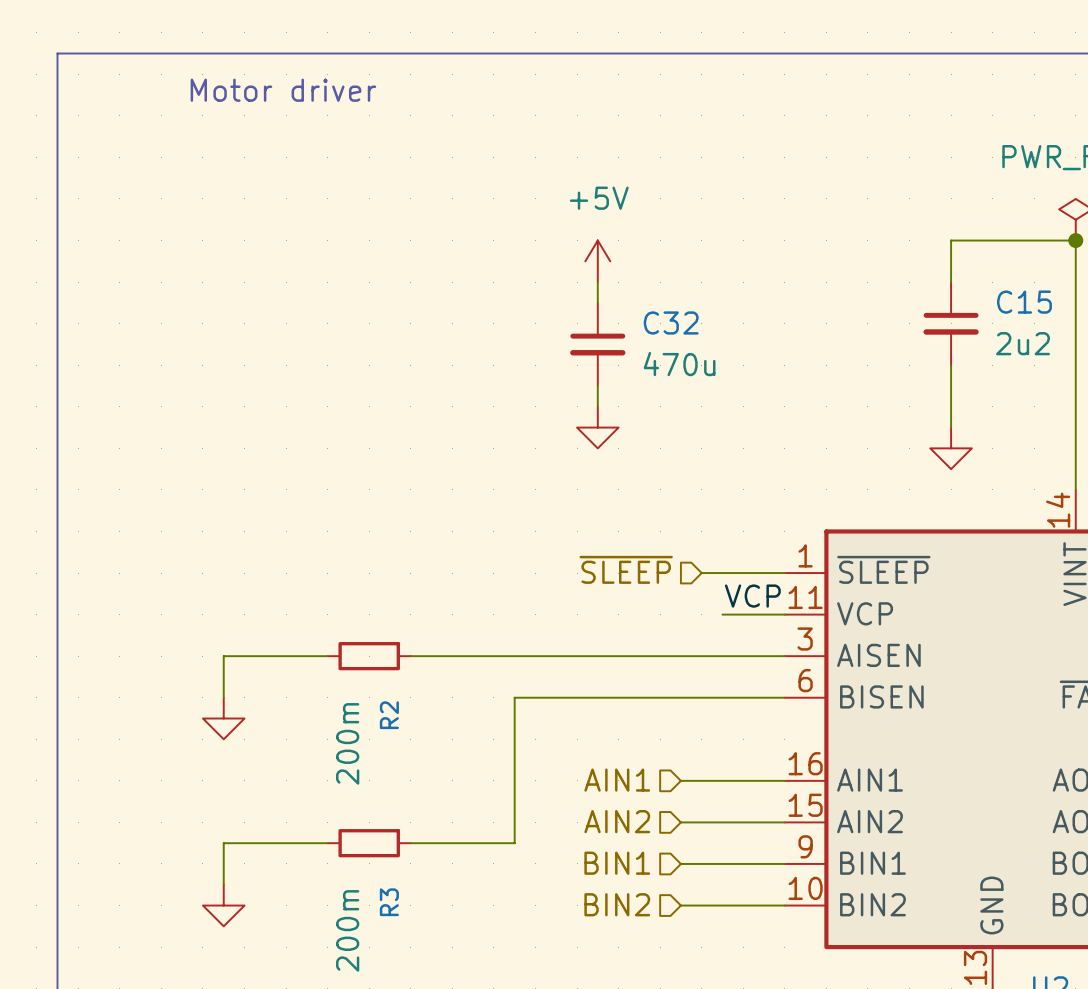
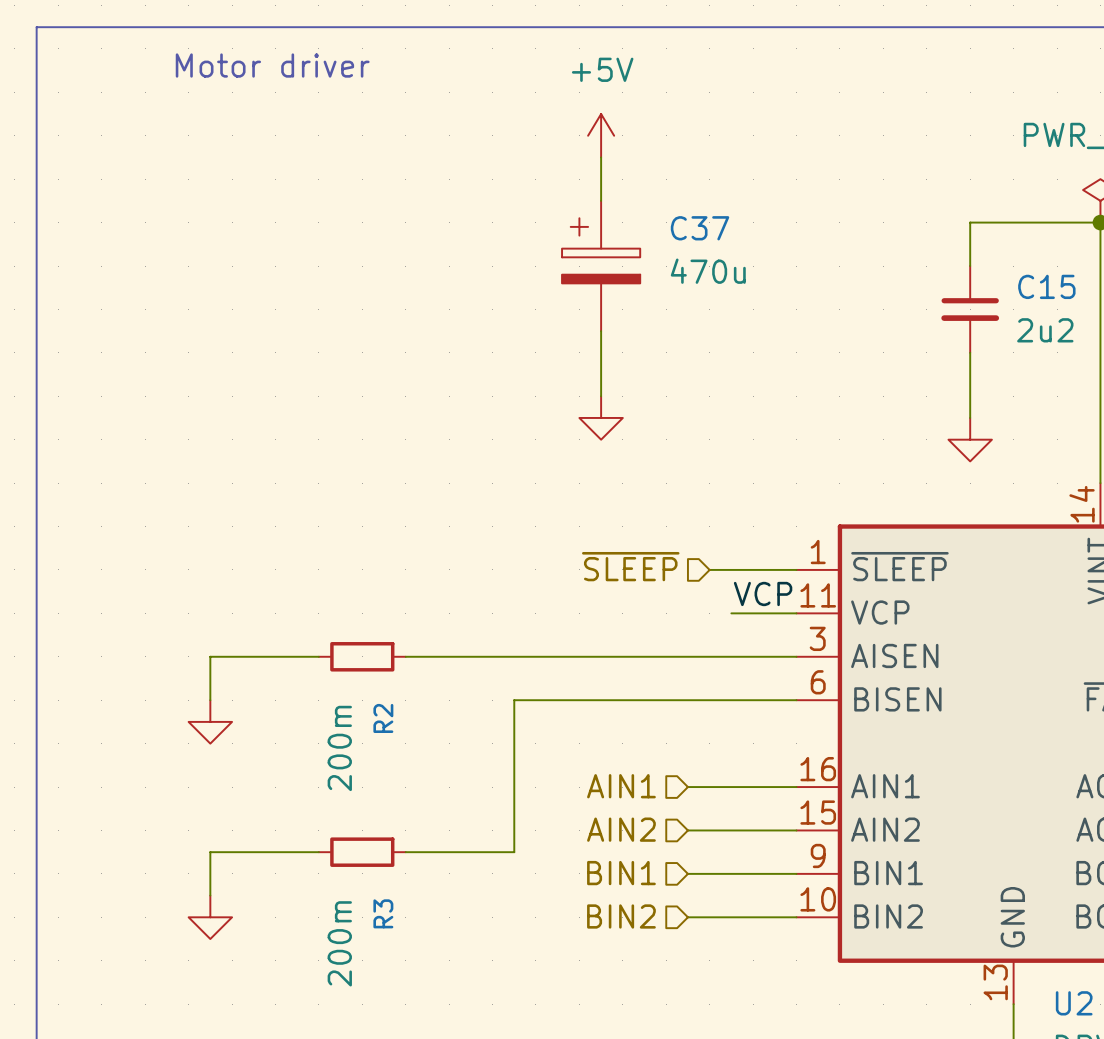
wire: none -> (601, 157) (601, 200)
power symbol position: +5V (597, 261) -> +5V (601, 135)
C37: none -> 470u (601, 266)
C32: 470u (597, 344) -> none

